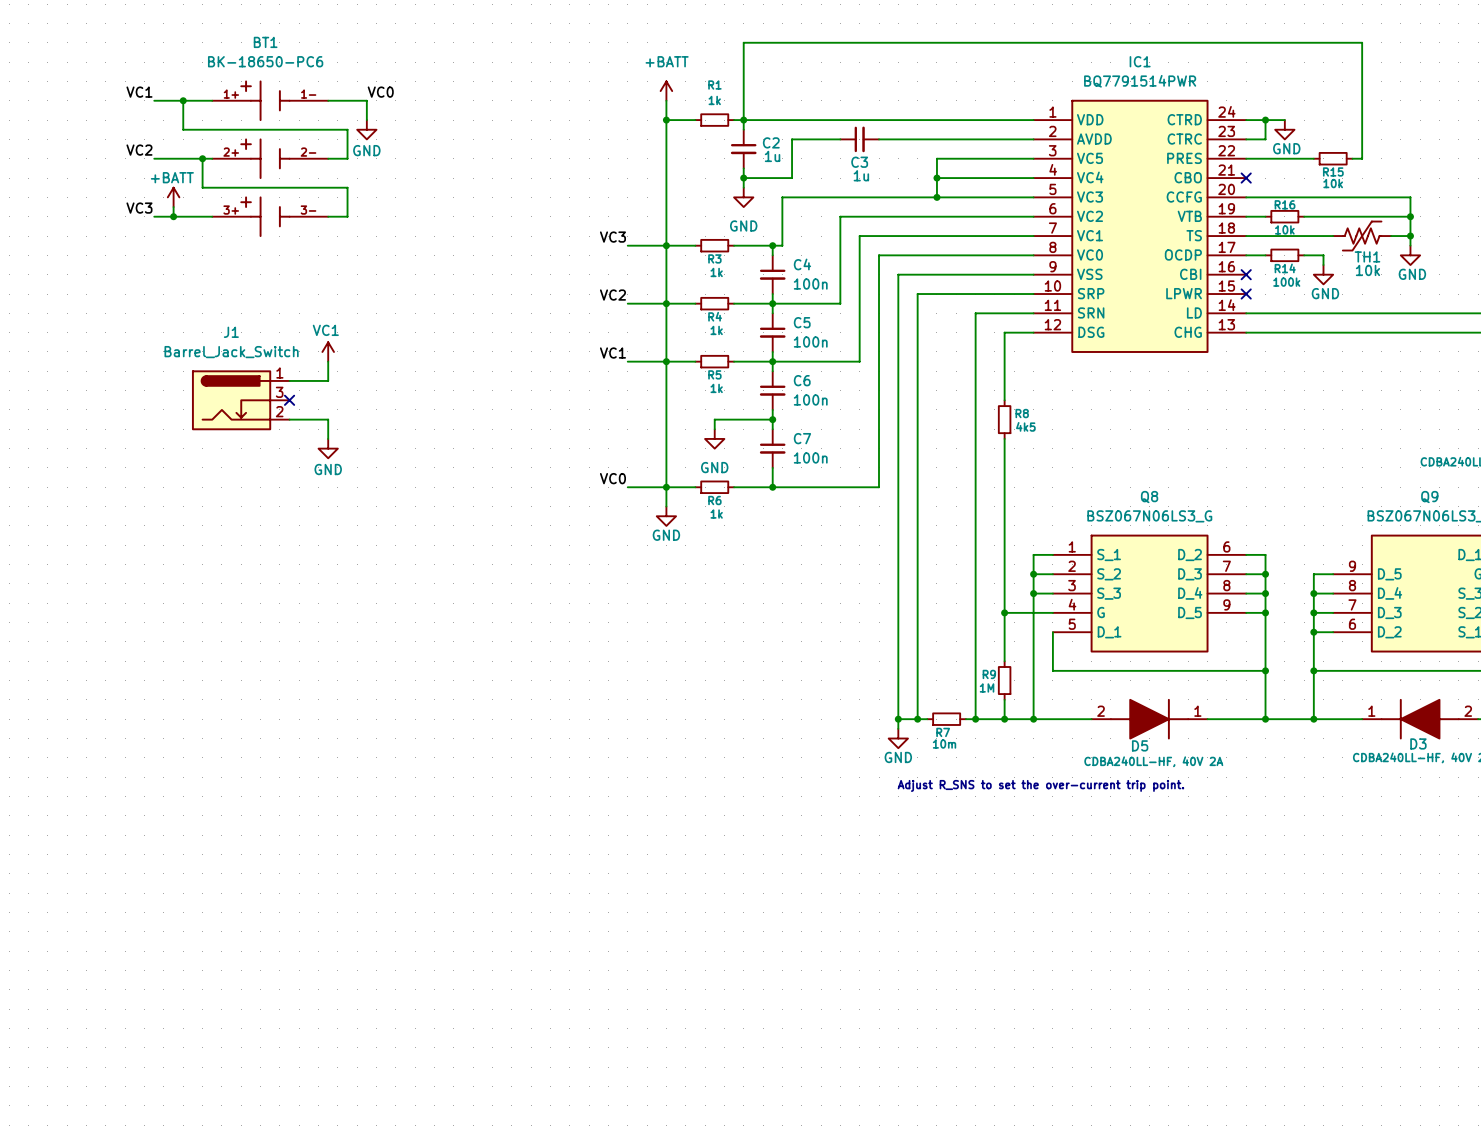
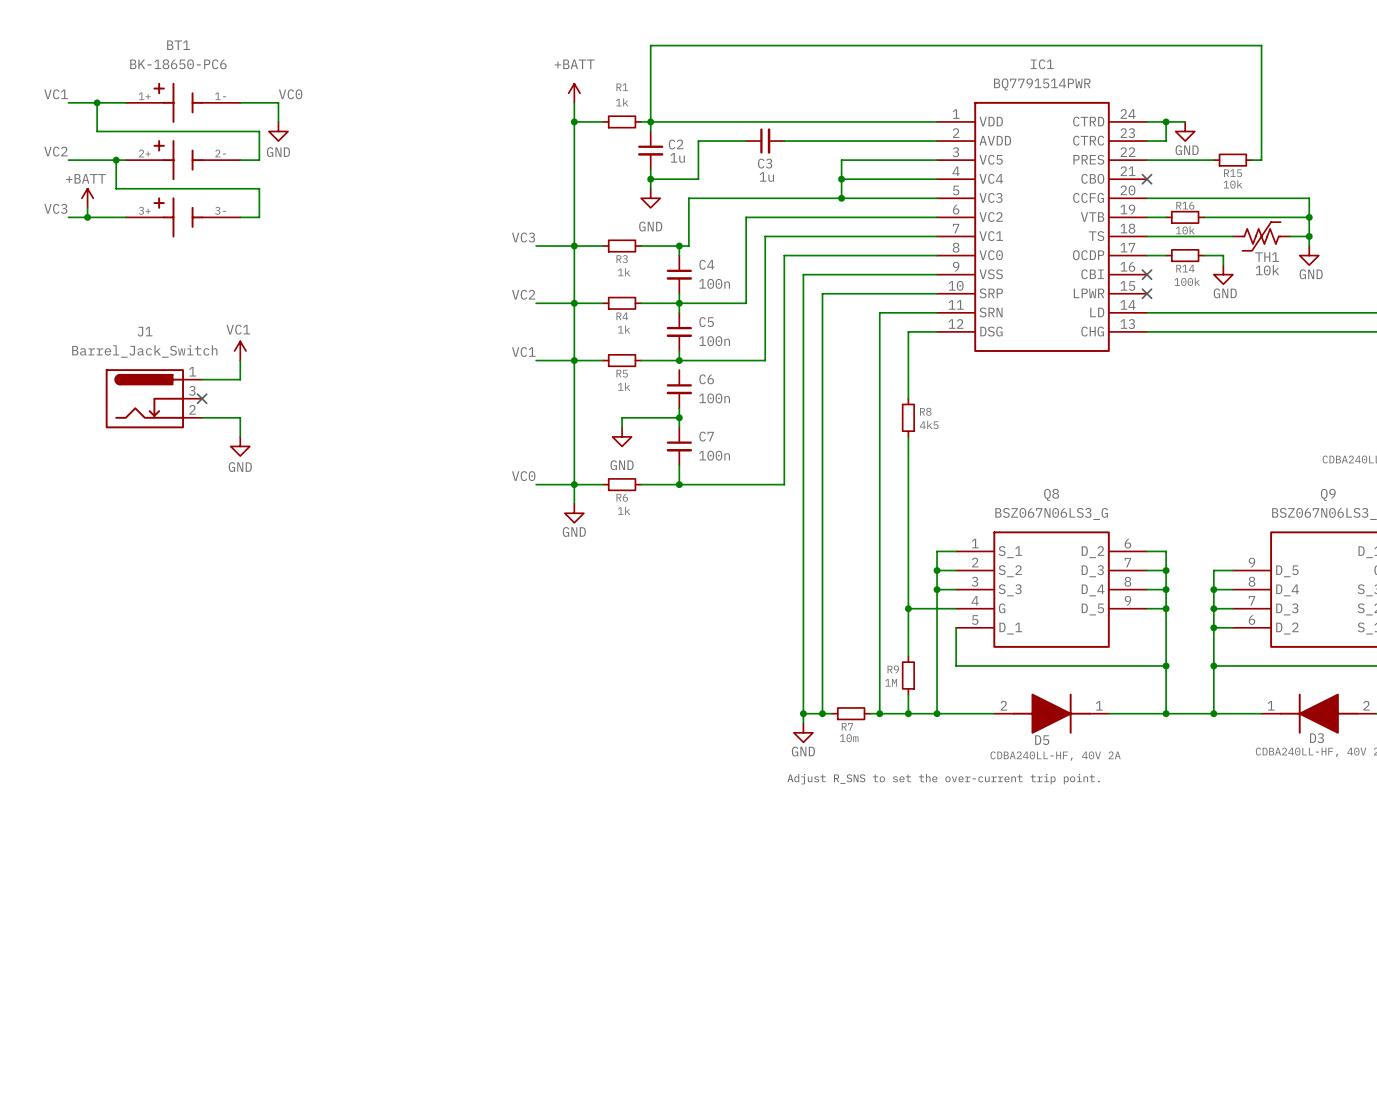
wire: (772, 361) (772, 371) -> none

